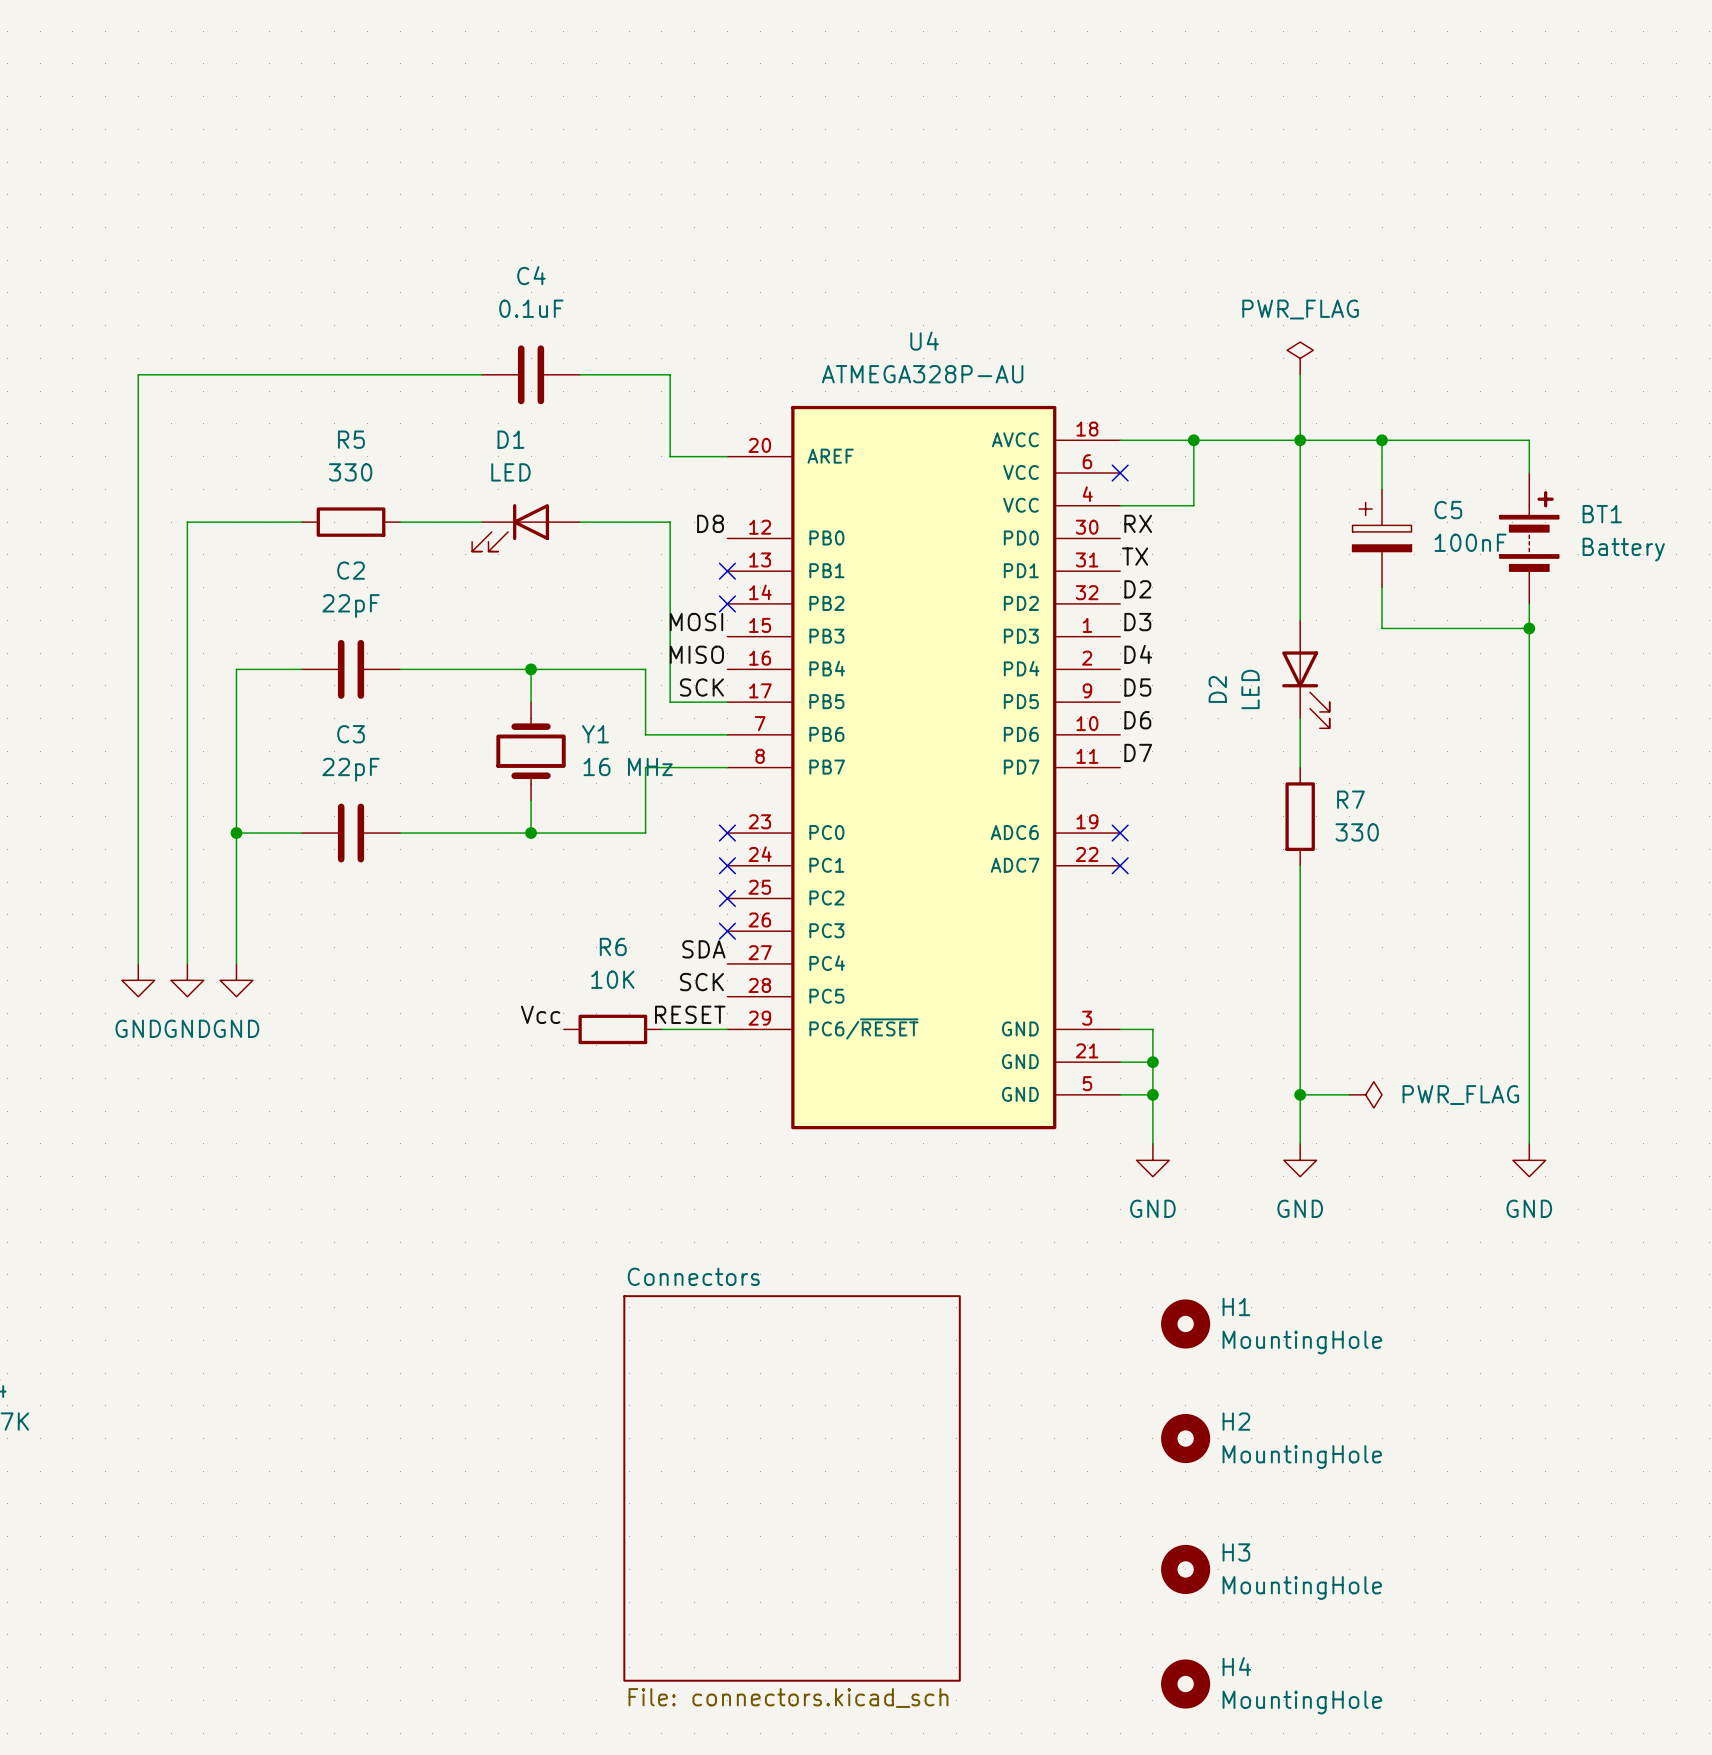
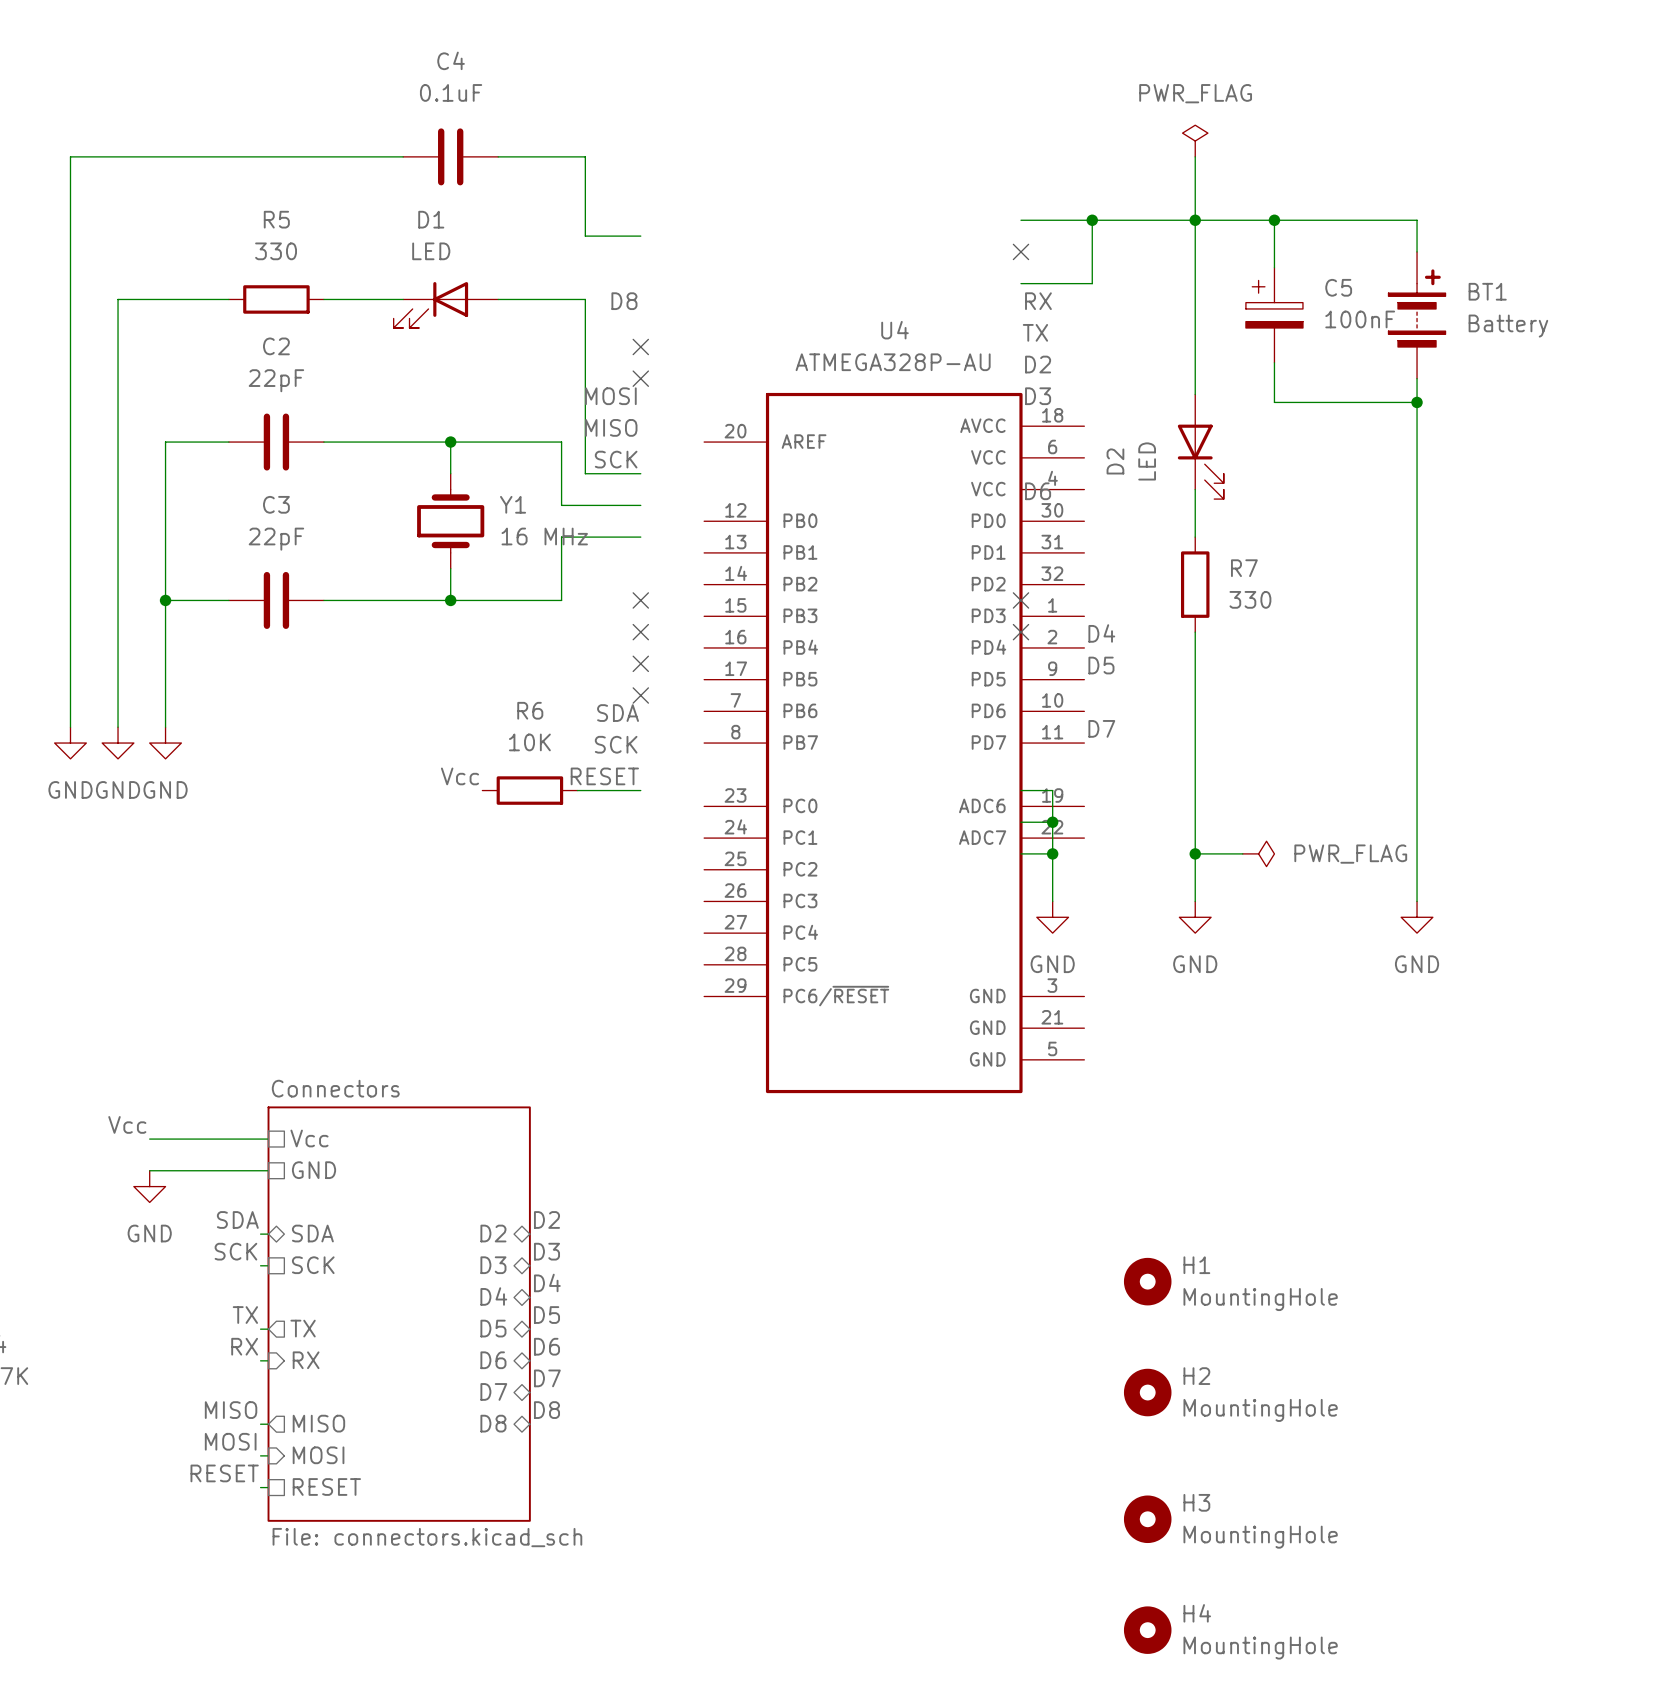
junction: none -> (1092, 220)
junction: none -> (1195, 220)
junction: none -> (1274, 220)
no-connect mark: none -> (1020, 251)
wire: none -> (498, 299) (585, 299) (585, 473) (640, 473)
no-connect mark: none -> (640, 346)
power symbol position: PWR_FLAG (1300, 358) -> PWR_FLAG (1195, 141)
wire: (481, 374) (138, 374) (138, 963) -> (403, 156) (70, 156) (70, 727)
C4 position: (531, 374) -> (450, 156)
wire: (580, 374) (670, 374) (670, 456) (727, 456) -> (498, 156) (585, 156) (585, 236) (640, 236)
wire: (1300, 374) (1300, 620) -> (1195, 156) (1195, 394)
no-connect mark: none -> (640, 378)
junction: none -> (1417, 402)
wire: (1120, 440) (1529, 440) (1529, 473) -> (1020, 220) (1417, 220) (1417, 251)
wire: (1193, 440) (1193, 505) (1120, 505) -> (1092, 220) (1092, 283) (1020, 283)
junction: (1193, 440) -> none
junction: (1300, 440) -> none
wire: (1382, 440) (1382, 489) -> (1274, 220) (1274, 267)
junction: (1382, 440) -> none
wire: none -> (323, 442) (561, 442) (561, 505)
junction: none -> (450, 442)
no-connect mark: (1120, 473) -> none
label: none -> SCK (616, 459)
wire: (301, 522) (187, 522) (187, 963) -> (228, 299) (118, 299) (118, 727)
R5 position: (351, 522) -> (276, 299)
wire: (400, 522) (481, 522) -> (323, 299) (403, 299)
wire: (661, 522) (670, 522) (670, 702) (727, 702) -> none
label position: D8 (710, 523) -> D8 (624, 301)
label position: RX (1138, 523) -> RX (1038, 301)
D1 position: (526, 527) -> (445, 305)
C5 position: (1382, 538) -> (1274, 315)
BT1 position: (1529, 538) -> (1417, 315)
label position: TX (1135, 556) -> TX (1035, 332)
no-connect mark: (727, 571) -> none
wire: (1382, 587) (1382, 628) (1529, 628) -> (1274, 362) (1274, 402) (1417, 402)
label position: D2 (1137, 589) -> D2 (1038, 364)
no-connect mark: (727, 603) -> none
wire: (1529, 603) (1529, 1143) -> (1417, 378) (1417, 901)
junction: none -> (165, 600)
junction: none -> (450, 600)
no-connect mark: none -> (640, 600)
no-connect mark: none -> (1020, 600)
label position: MOSI (696, 622) -> MOSI (610, 396)
label position: D3 (1137, 622) -> D3 (1038, 396)
junction: (1529, 628) -> none
no-connect mark: none -> (640, 632)
no-connect mark: none -> (1020, 632)
label position: MISO (696, 654) -> MISO (611, 427)
wire: (301, 669) (236, 669) (236, 963) -> (228, 442) (165, 442) (165, 727)
C2 position: (351, 669) -> (276, 442)
wire: (400, 669) (645, 669) (645, 734) (727, 734) -> none
wire: (531, 669) (531, 702) -> (450, 442) (450, 473)
junction: (531, 669) -> none
D2 position: (1305, 674) -> (1200, 446)
no-connect mark: none -> (640, 663)
label position: SCK (701, 687) -> SCK (616, 744)
no-connect mark: none -> (640, 695)
wire: (1300, 718) (1300, 767) -> (1195, 489) (1195, 537)
label position: D6 (1137, 720) -> D6 (1038, 491)
Y1 position: (531, 751) -> (450, 521)
power symbol: none -> GND (70, 743)
power symbol: none -> GND (118, 743)
power symbol: none -> GND (165, 743)
wire: (727, 767) (645, 767) (645, 833) (400, 833) -> (640, 537) (561, 537) (561, 600) (323, 600)
wire: (531, 800) (531, 833) -> (450, 568) (450, 600)
label: none -> Vcc (460, 776)
R7 position: (1300, 816) -> (1195, 584)
wire: (236, 833) (301, 833) -> (165, 600) (228, 600)
junction: (236, 833) -> none
C3 position: (351, 833) -> (276, 600)
junction: (531, 833) -> none
no-connect mark: (727, 833) -> none
no-connect mark: (1120, 833) -> none
junction: none -> (1052, 822)
no-connect mark: (727, 865) -> none
no-connect mark: (1120, 865) -> none
wire: (1300, 865) (1300, 1143) -> (1195, 632) (1195, 901)
junction: none -> (1052, 853)
junction: none -> (1195, 853)
no-connect mark: (727, 898) -> none
no-connect mark: (727, 931) -> none
power symbol: none -> GND (1052, 917)
power symbol: none -> GND (1195, 917)
power symbol: none -> GND (1417, 917)
label position: SDA (703, 949) -> SDA (618, 713)
power symbol: GND (138, 980) -> none
power symbol: GND (187, 980) -> none
power symbol: GND (236, 980) -> none
label: SCK (701, 982) -> none
label: Vcc (540, 1014) -> none
label position: RESET (690, 1014) -> RESET (604, 776)
R6 position: (612, 1029) -> (529, 790)
wire: (661, 1029) (727, 1029) -> (577, 790) (640, 790)
wire: (1120, 1029) (1152, 1029) (1152, 1143) -> (1020, 790) (1052, 790) (1052, 901)
wire: (1120, 1062) (1152, 1062) -> (1020, 822) (1052, 822)
junction: (1152, 1062) -> none
wire: (1120, 1094) (1152, 1094) -> (1020, 853) (1052, 853)
junction: (1152, 1094) -> none
wire: (1300, 1094) (1349, 1094) -> (1195, 853) (1242, 853)
junction: (1300, 1094) -> none
power symbol position: PWR_FLAG (1365, 1094) -> PWR_FLAG (1258, 853)
power symbol: GND (1152, 1160) -> none
power symbol: GND (1300, 1160) -> none
power symbol: GND (1529, 1160) -> none
label: none -> Vcc (127, 1124)
wire: none -> (149, 1139) (268, 1139)
sheet pin: none -> Vcc (309, 1138)
sheet pin: none -> GND (314, 1170)
wire: none -> (149, 1170) (268, 1170)
power symbol: none -> GND (149, 1186)
label: none -> SDA (237, 1219)
label: none -> D2 (546, 1219)
wire: none -> (260, 1234) (268, 1234)
sheet pin: none -> SDA (312, 1233)
sheet pin: none -> D2 (493, 1233)
label: none -> SCK (235, 1251)
label: none -> D3 (546, 1251)
wire: none -> (260, 1265) (268, 1265)
sheet pin: none -> SCK (313, 1265)
sheet pin: none -> D3 (493, 1265)
label: none -> D4 (547, 1282)
sheet pin: none -> D4 (493, 1296)
sheet Connectors: none -> File: connectors.kicad_sch (399, 1314)
label: none -> TX (245, 1315)
label: none -> D5 (546, 1315)
sheet pin: none -> TX (303, 1328)
sheet pin: none -> D5 (493, 1328)
wire: none -> (260, 1329) (268, 1329)
label: none -> RX (244, 1346)
label: none -> D6 (546, 1346)
wire: none -> (260, 1360) (268, 1360)
sheet pin: none -> RX (306, 1360)
sheet pin: none -> D6 (493, 1360)
label: none -> D7 (547, 1378)
sheet pin: none -> D7 (493, 1391)
label: none -> MISO (231, 1410)
label: none -> D8 (546, 1410)
sheet pin: none -> MISO (318, 1423)
sheet pin: none -> D8 (493, 1423)
wire: none -> (260, 1424) (268, 1424)
sheet Connectors: File: connectors.kicad_sch (792, 1488) -> none
label: none -> MOSI (230, 1441)
wire: none -> (260, 1455) (268, 1455)
sheet pin: none -> MOSI (318, 1455)
label: none -> RESET (224, 1473)
wire: none -> (260, 1487) (268, 1487)
sheet pin: none -> RESET (326, 1486)

